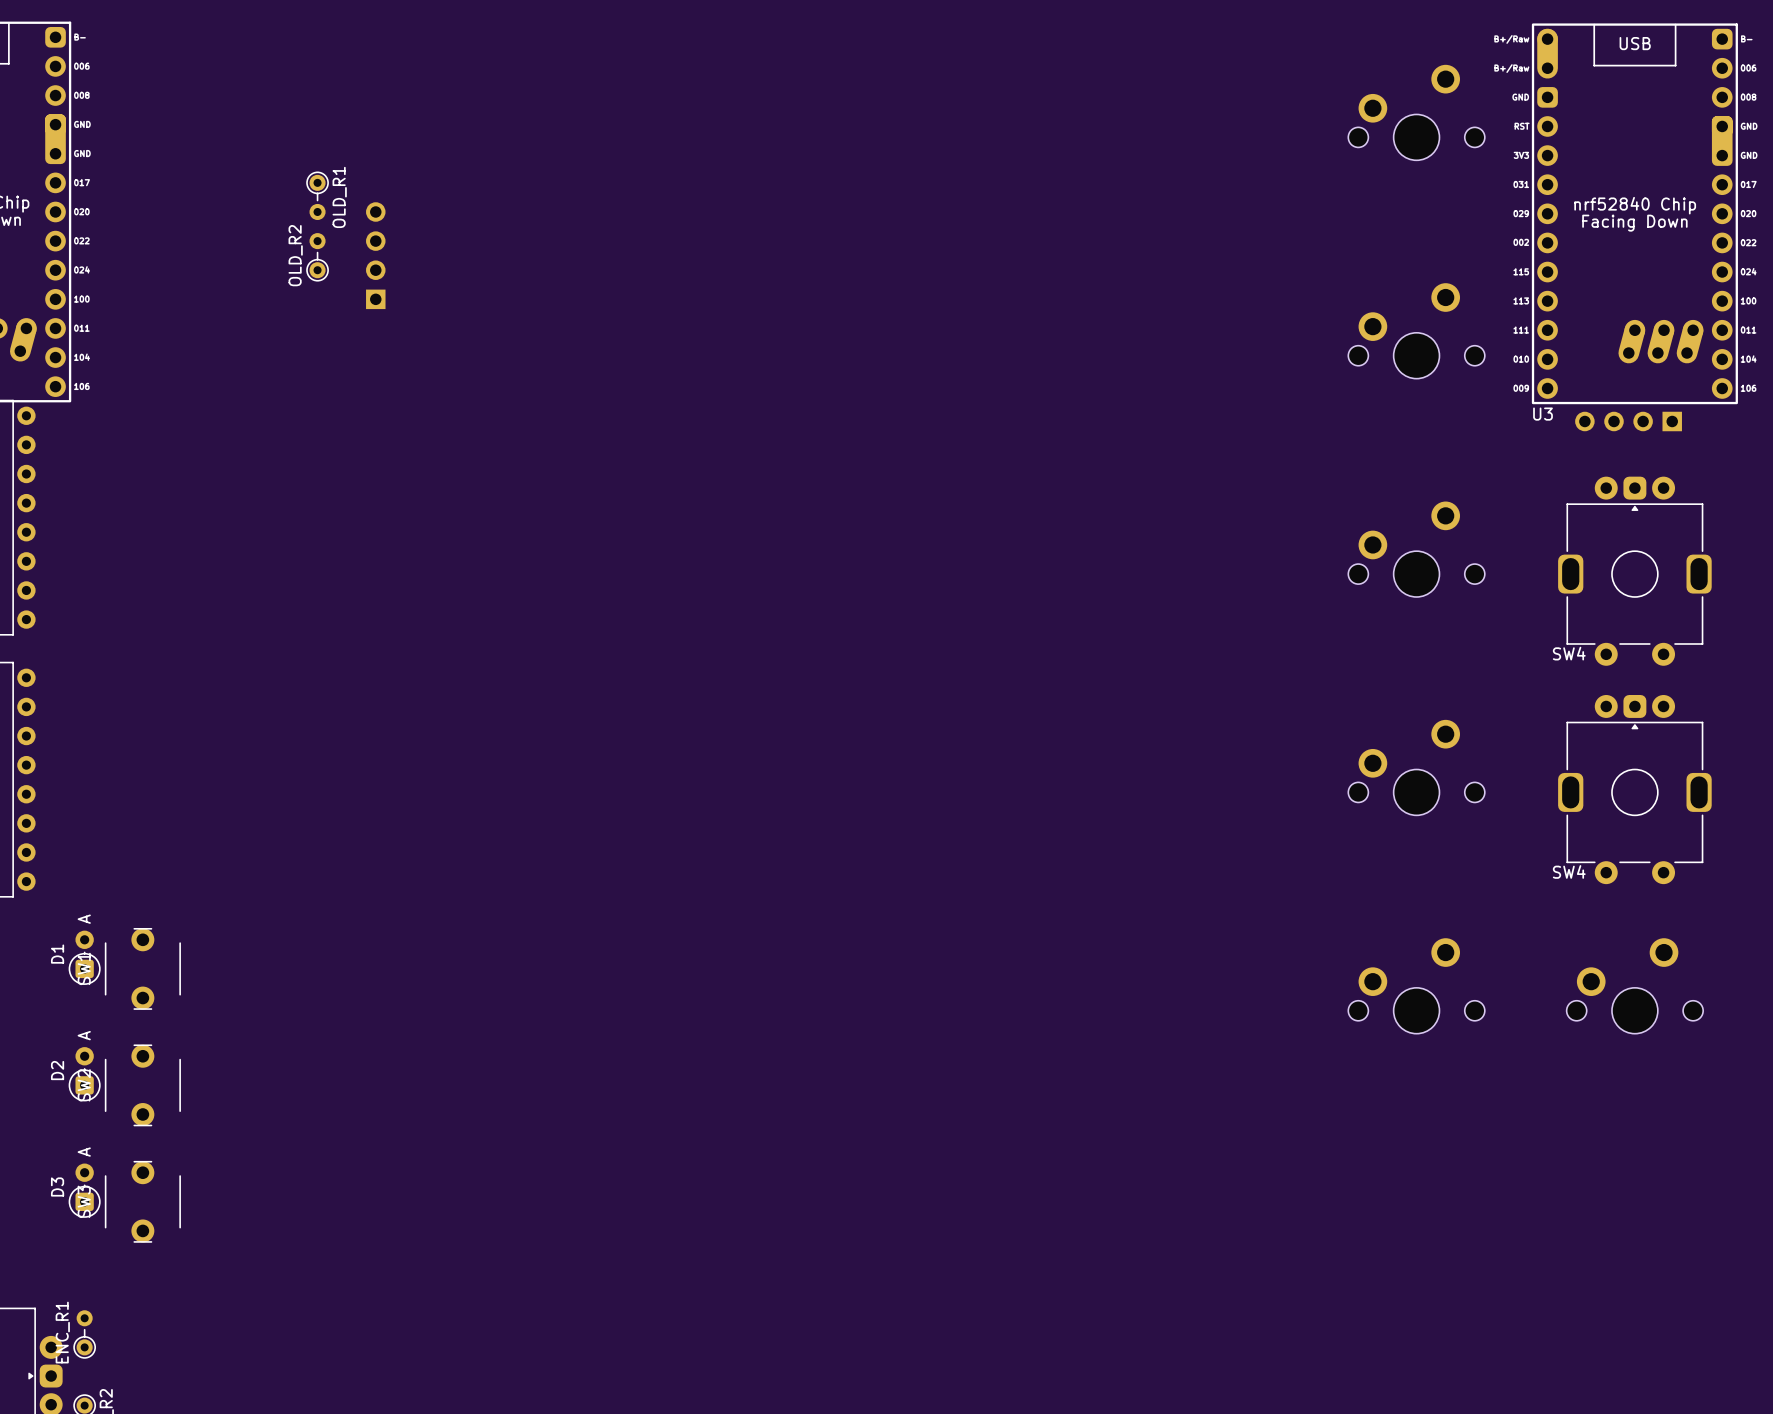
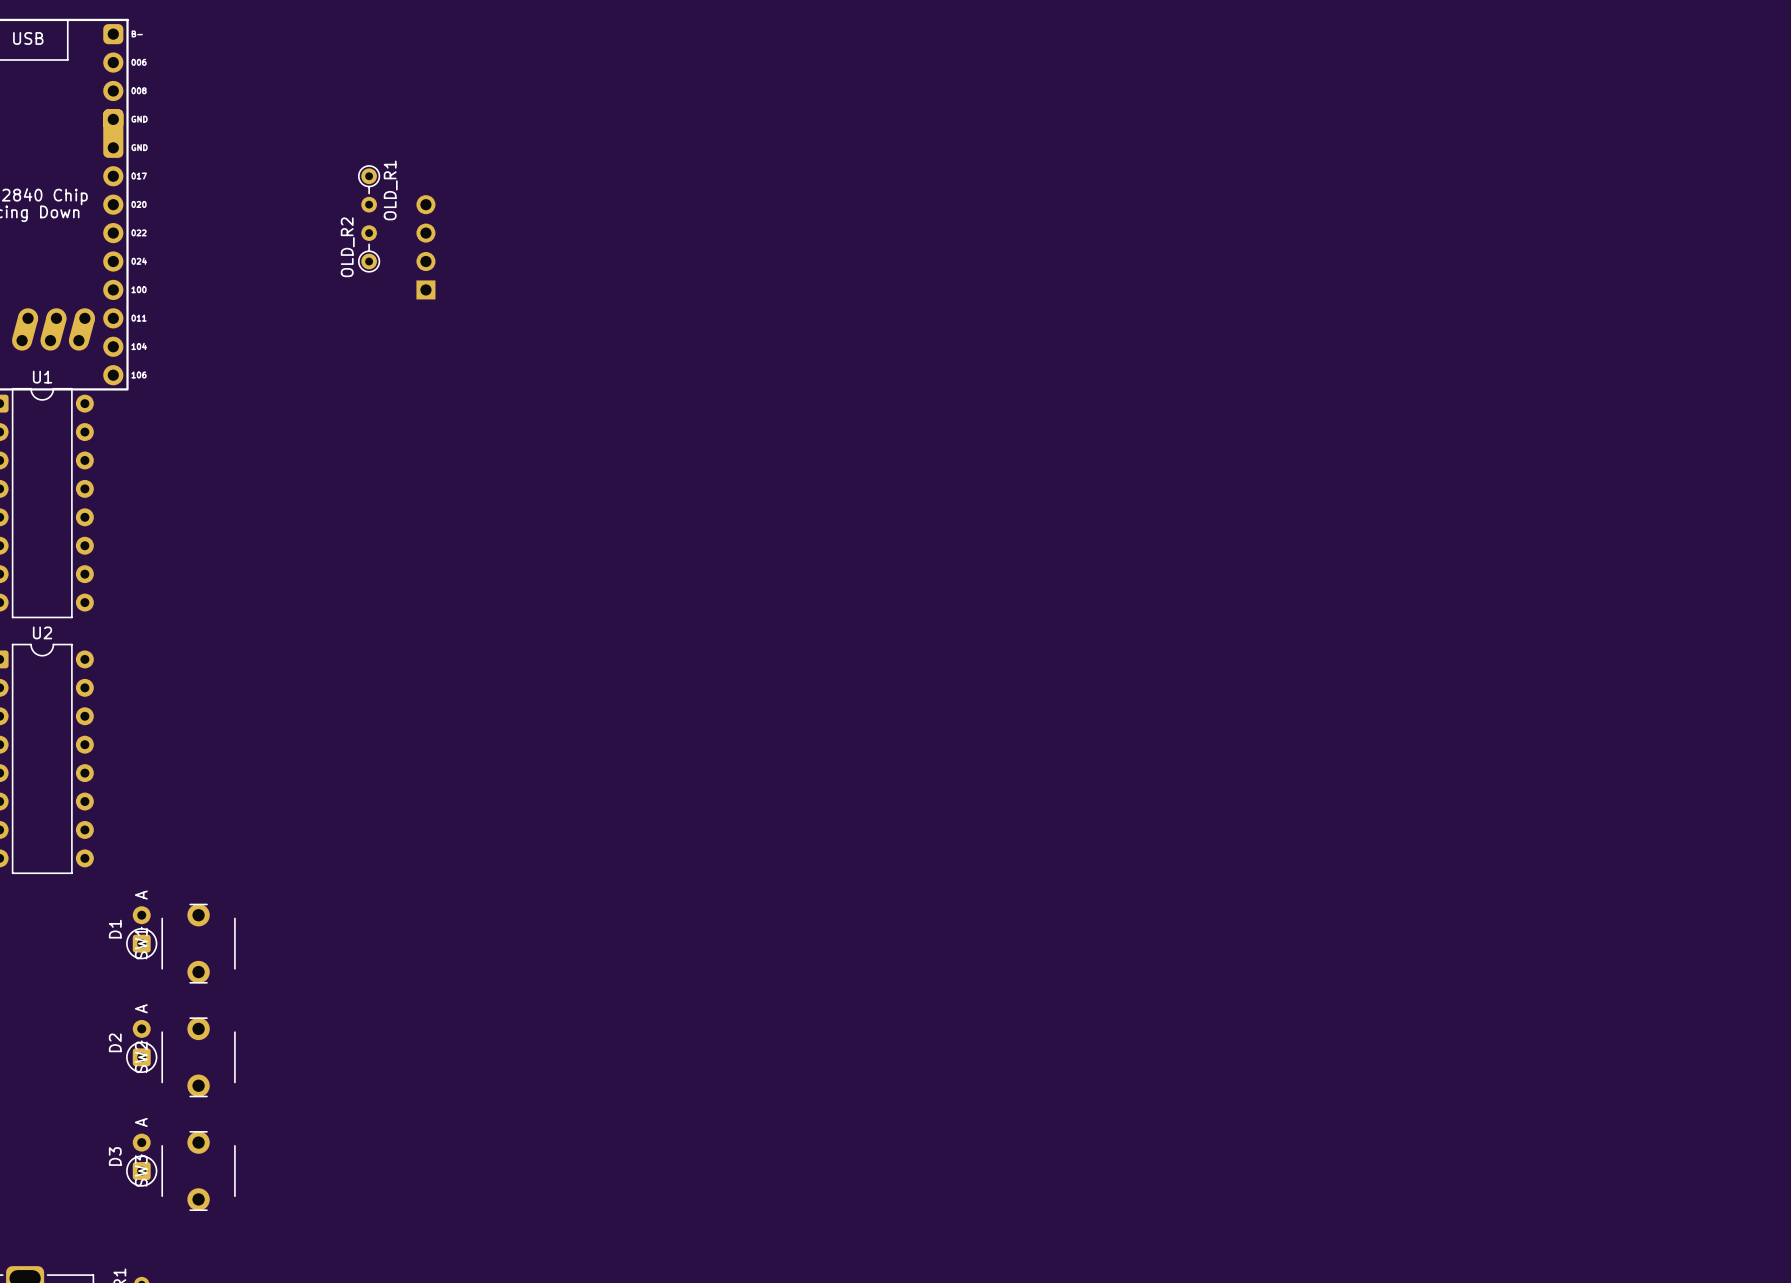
part: (1416, 112) -> none
U3: (1634, 213) -> none
part: (1416, 330) -> none
part: (1628, 421) -> none
part: (1416, 549) -> none
SW4: (1634, 571) -> none
part: (1416, 767) -> none
SW4: (1634, 789) -> none
part: (1416, 985) -> none
part: (1634, 985) -> none

